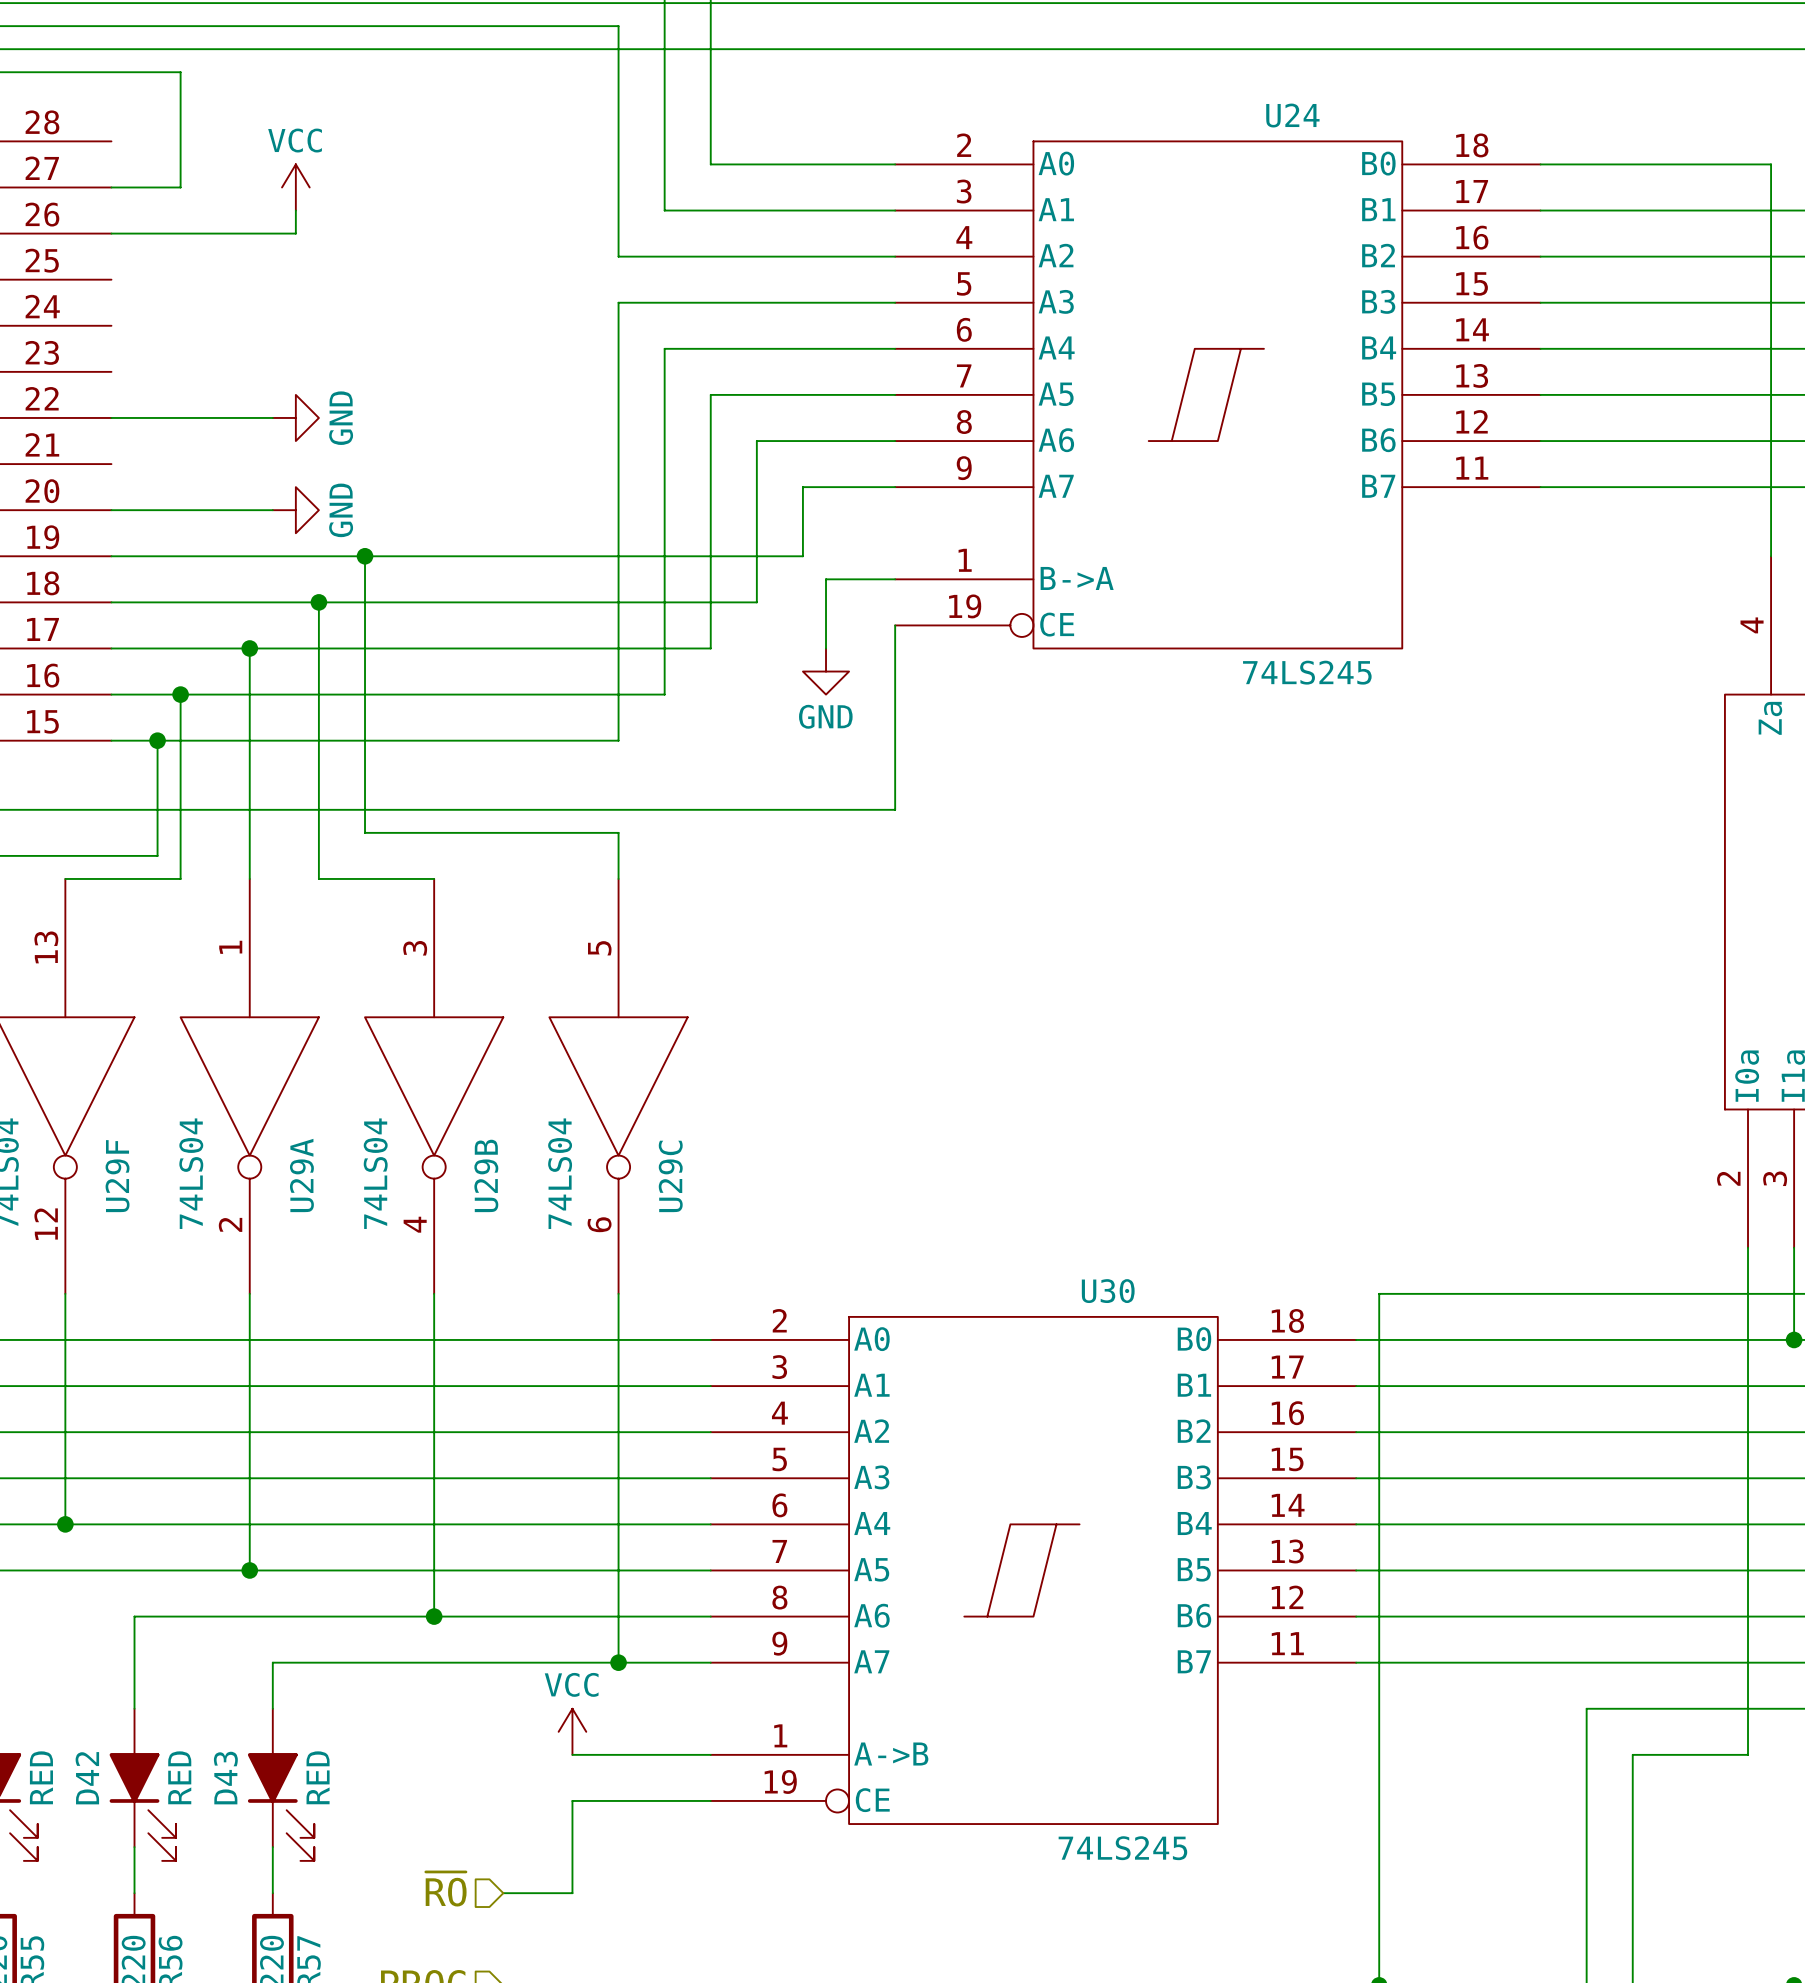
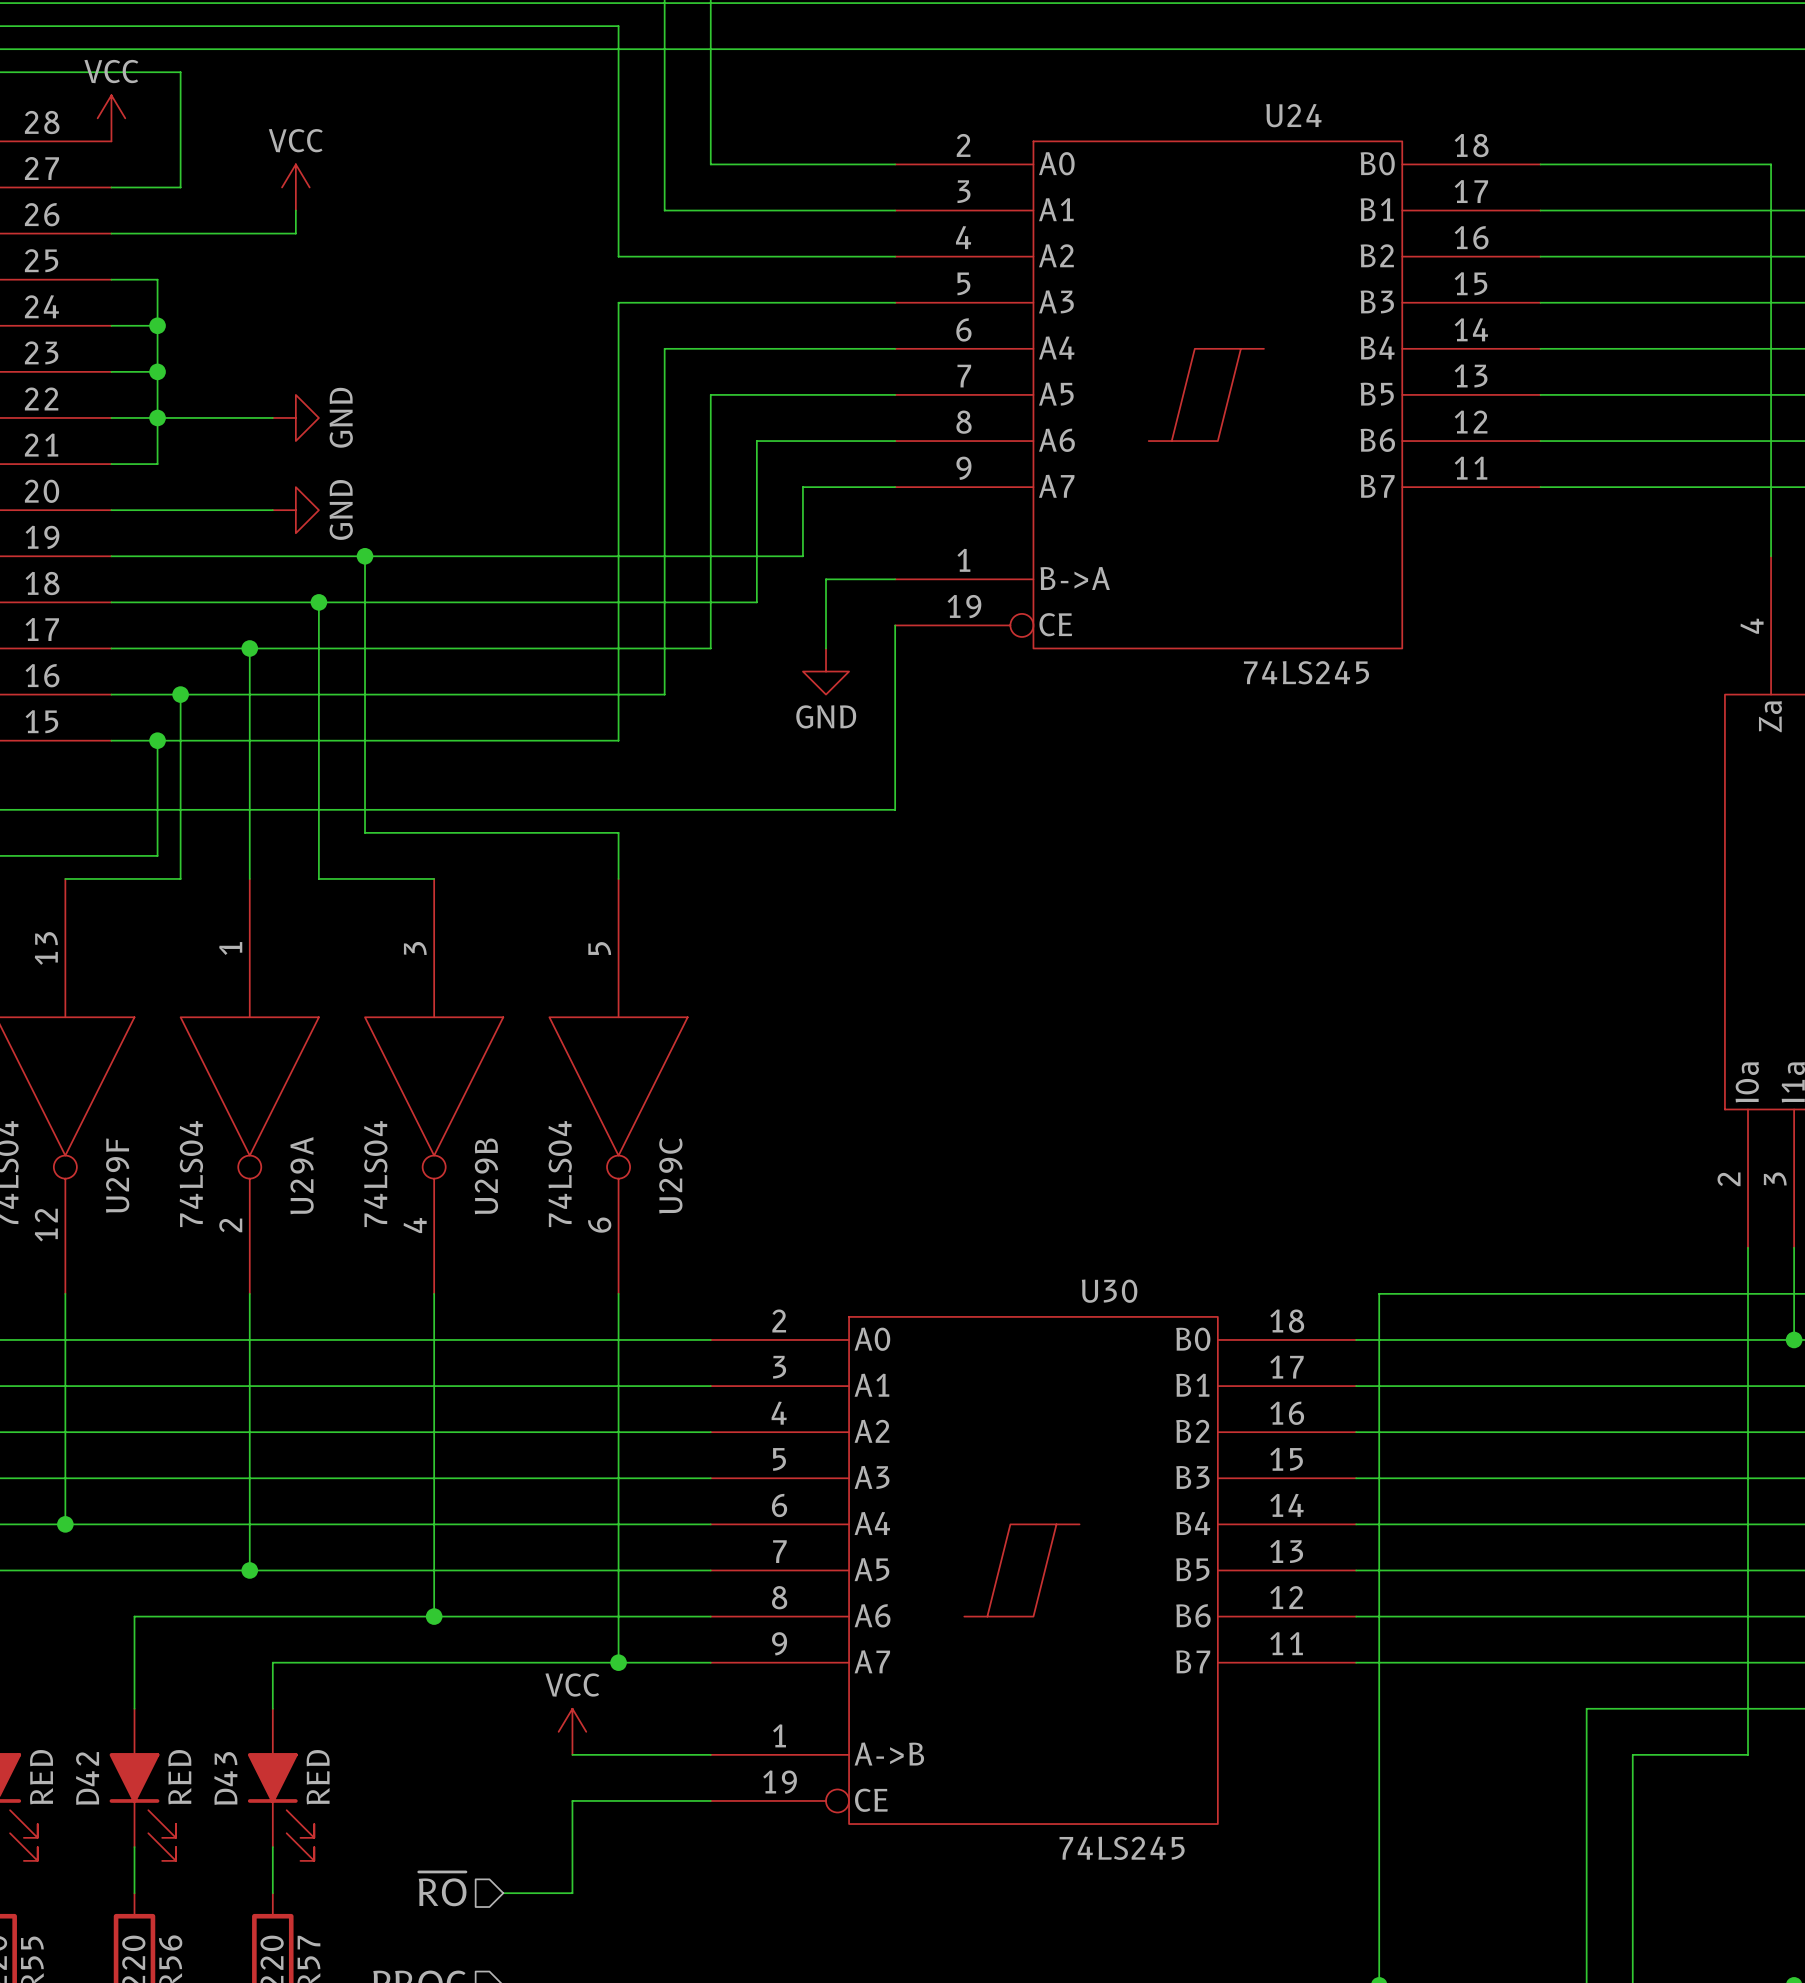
power symbol: none -> VCC (111, 118)
wire: none -> (111, 279) (157, 279) (157, 464) (111, 464)
wire: none -> (111, 325) (157, 325)
junction: none -> (157, 325)
wire: none -> (111, 371) (157, 371)
junction: none -> (157, 371)
junction: none -> (157, 417)

